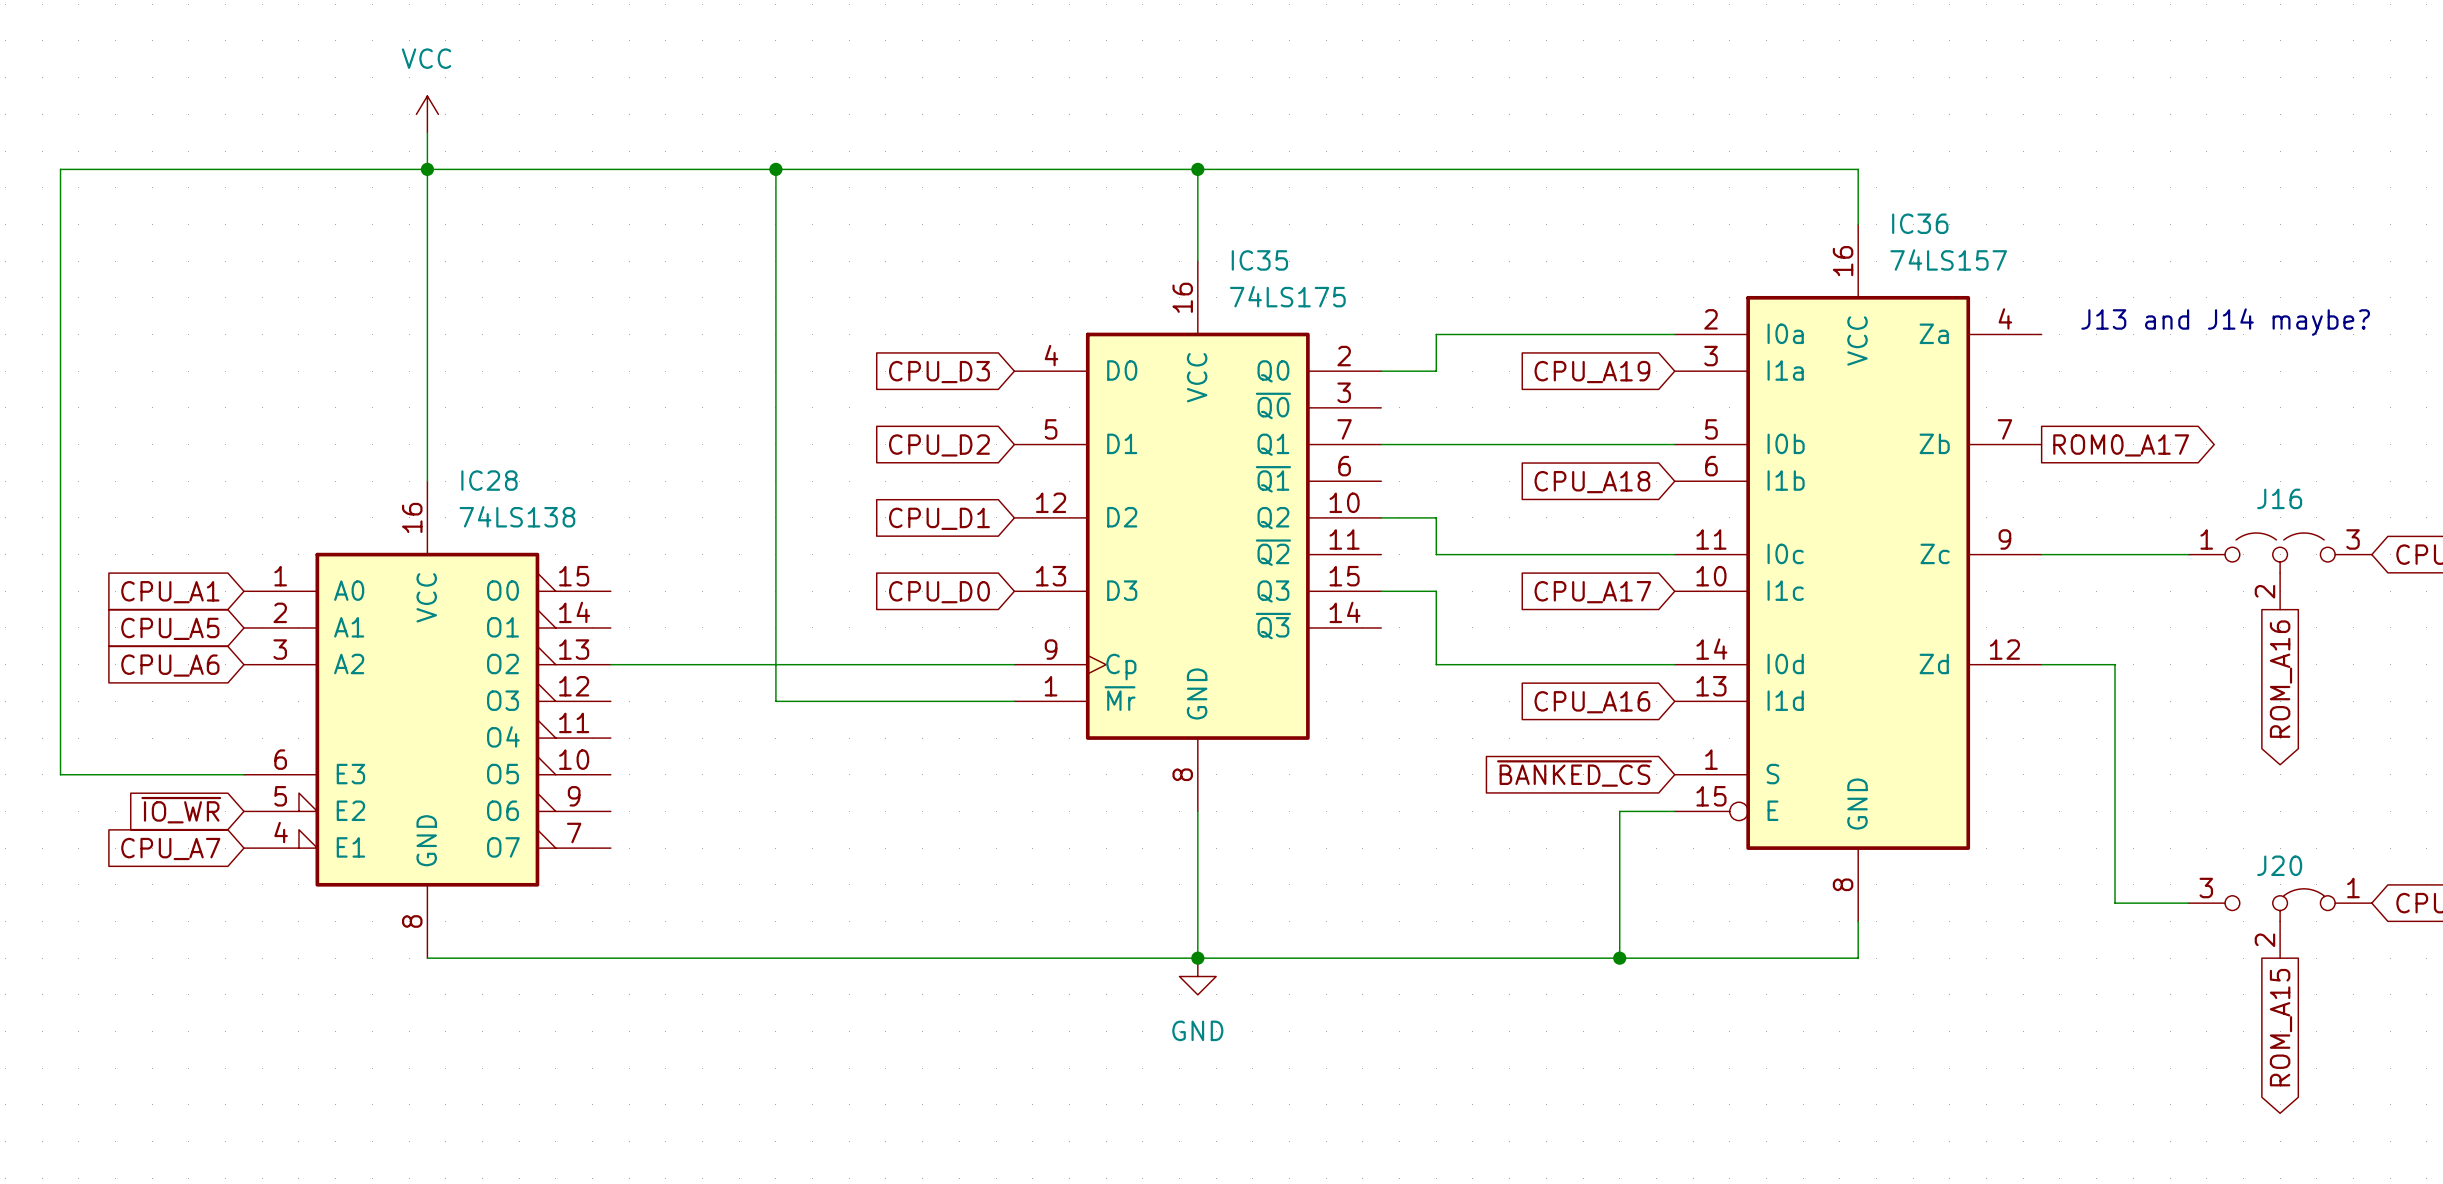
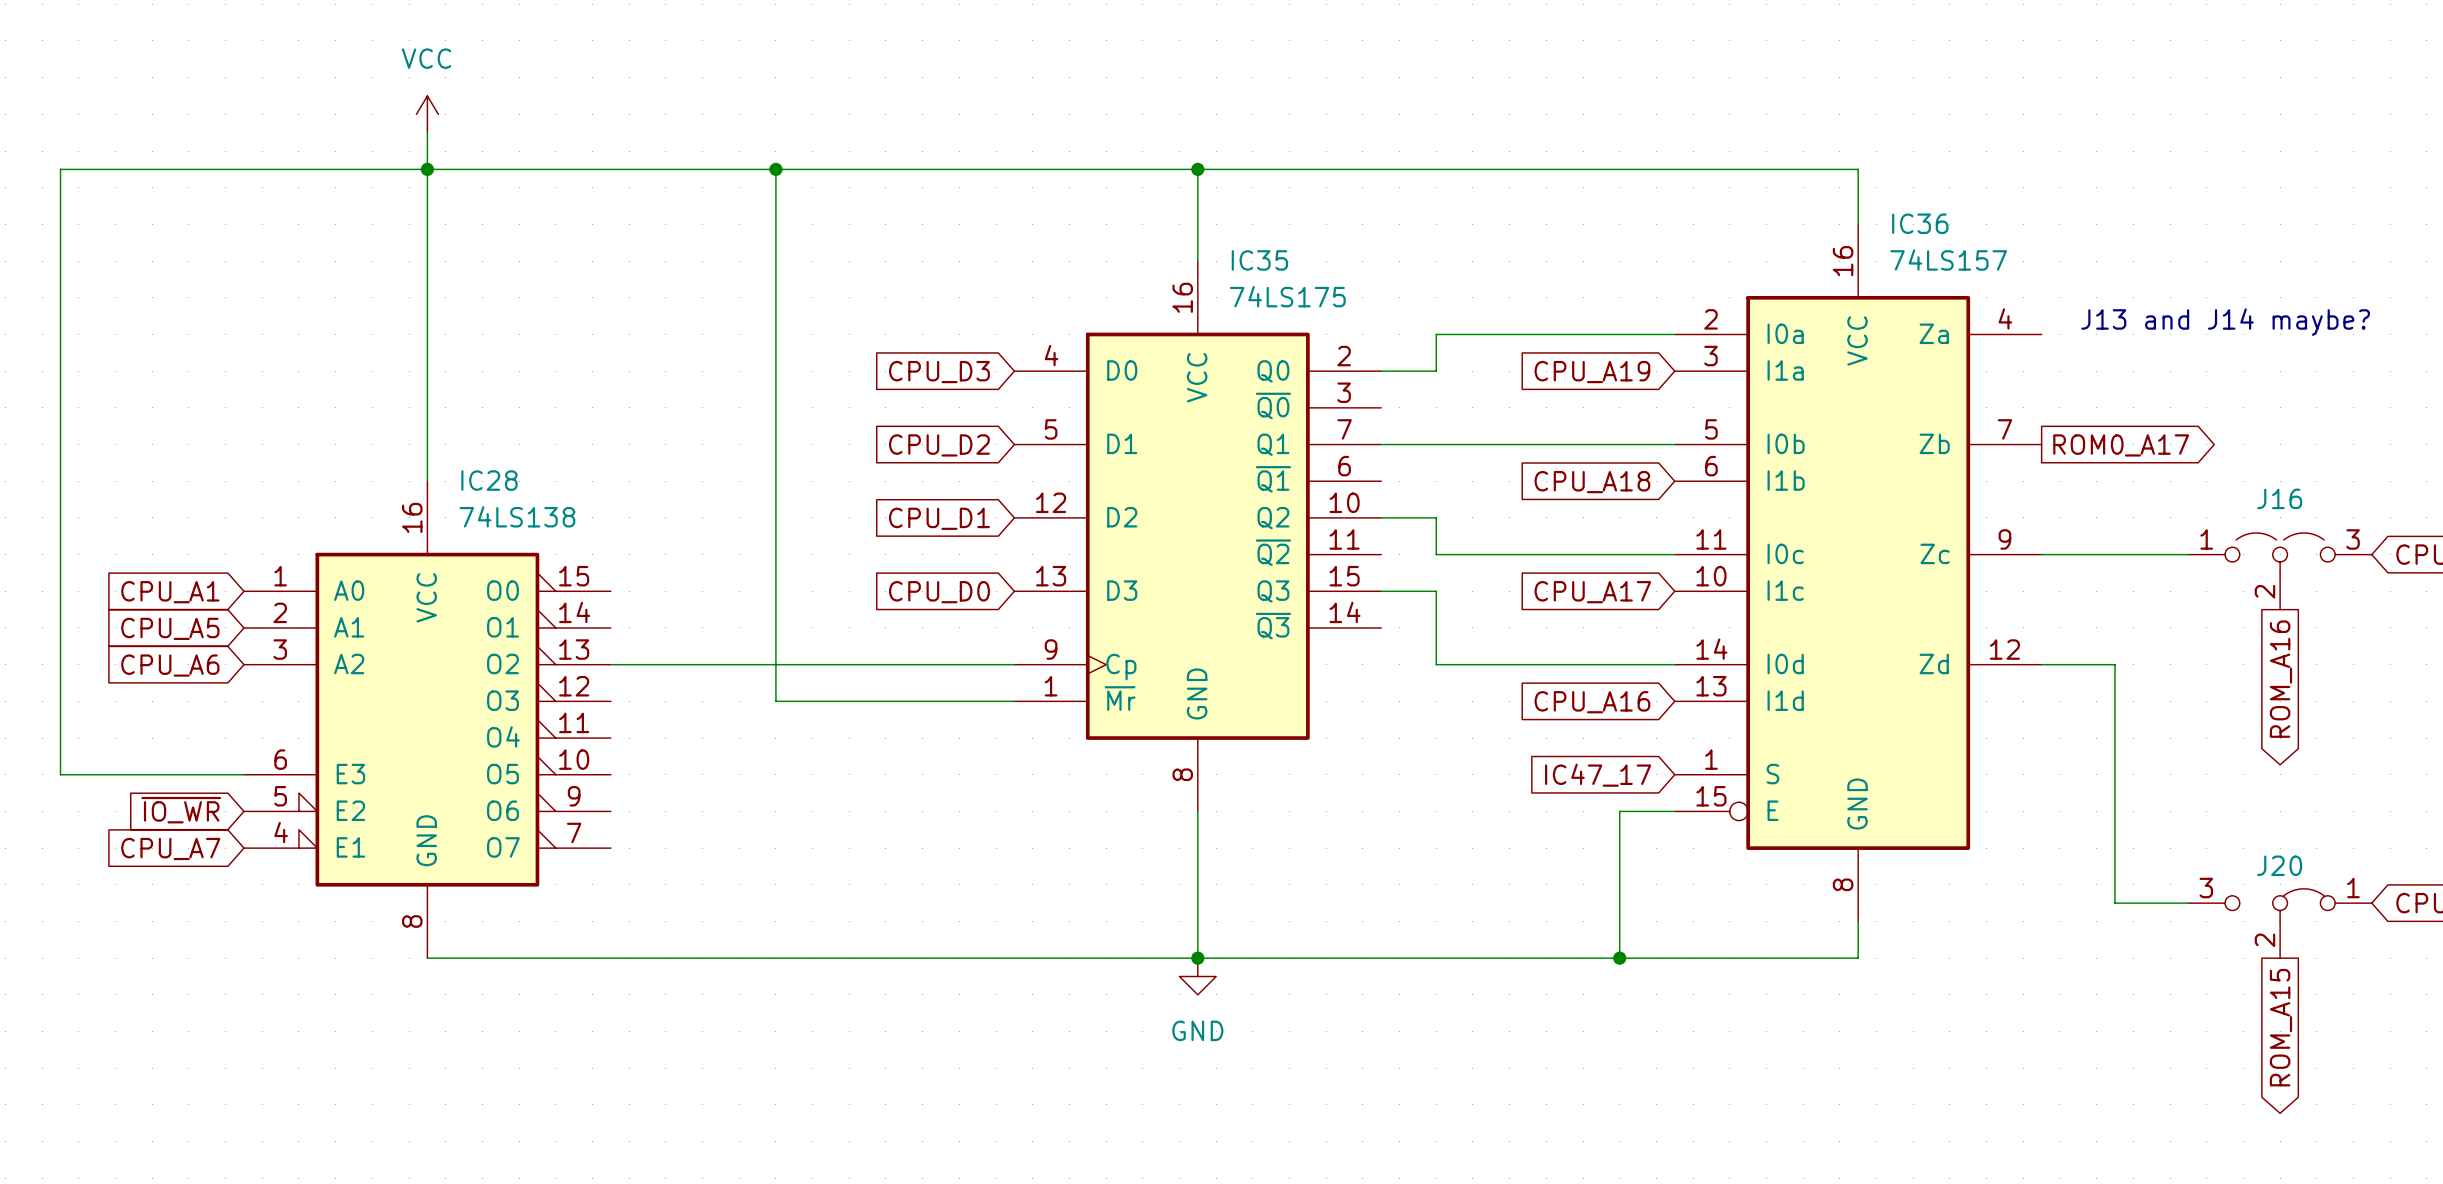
global label: ~{BANKED_CS} (1574, 773) -> IC47_17 (1598, 775)

